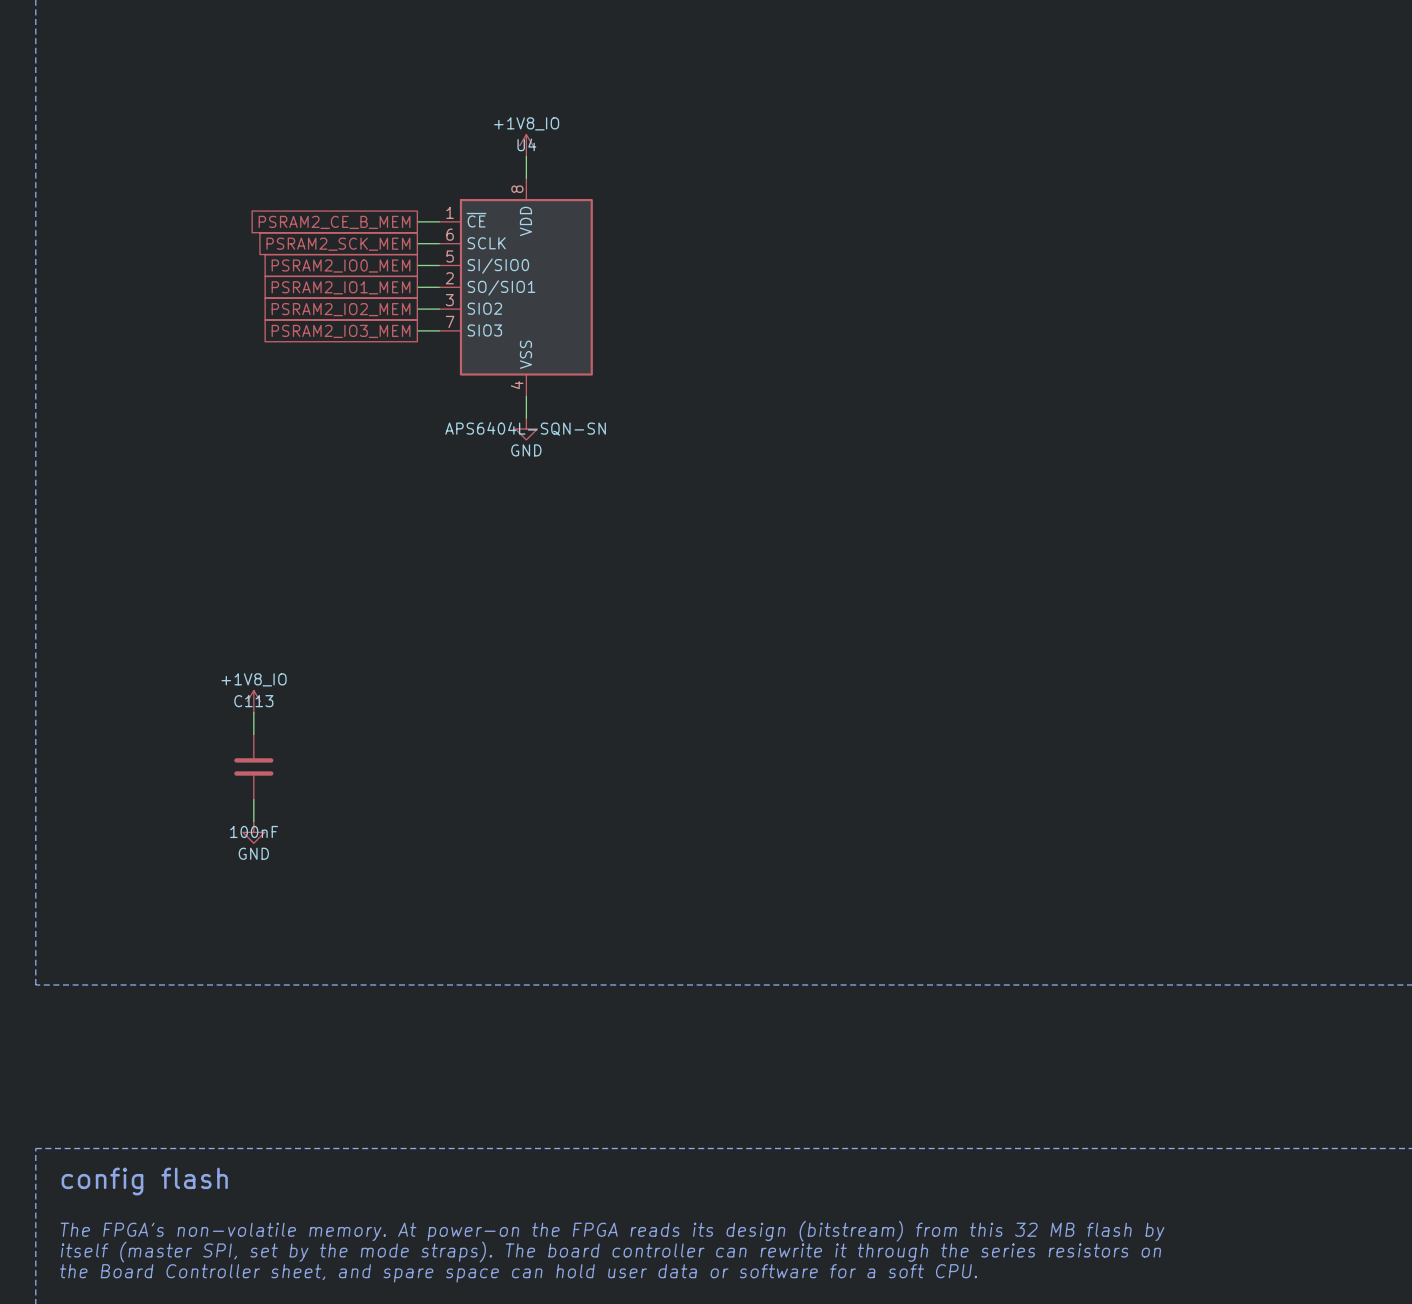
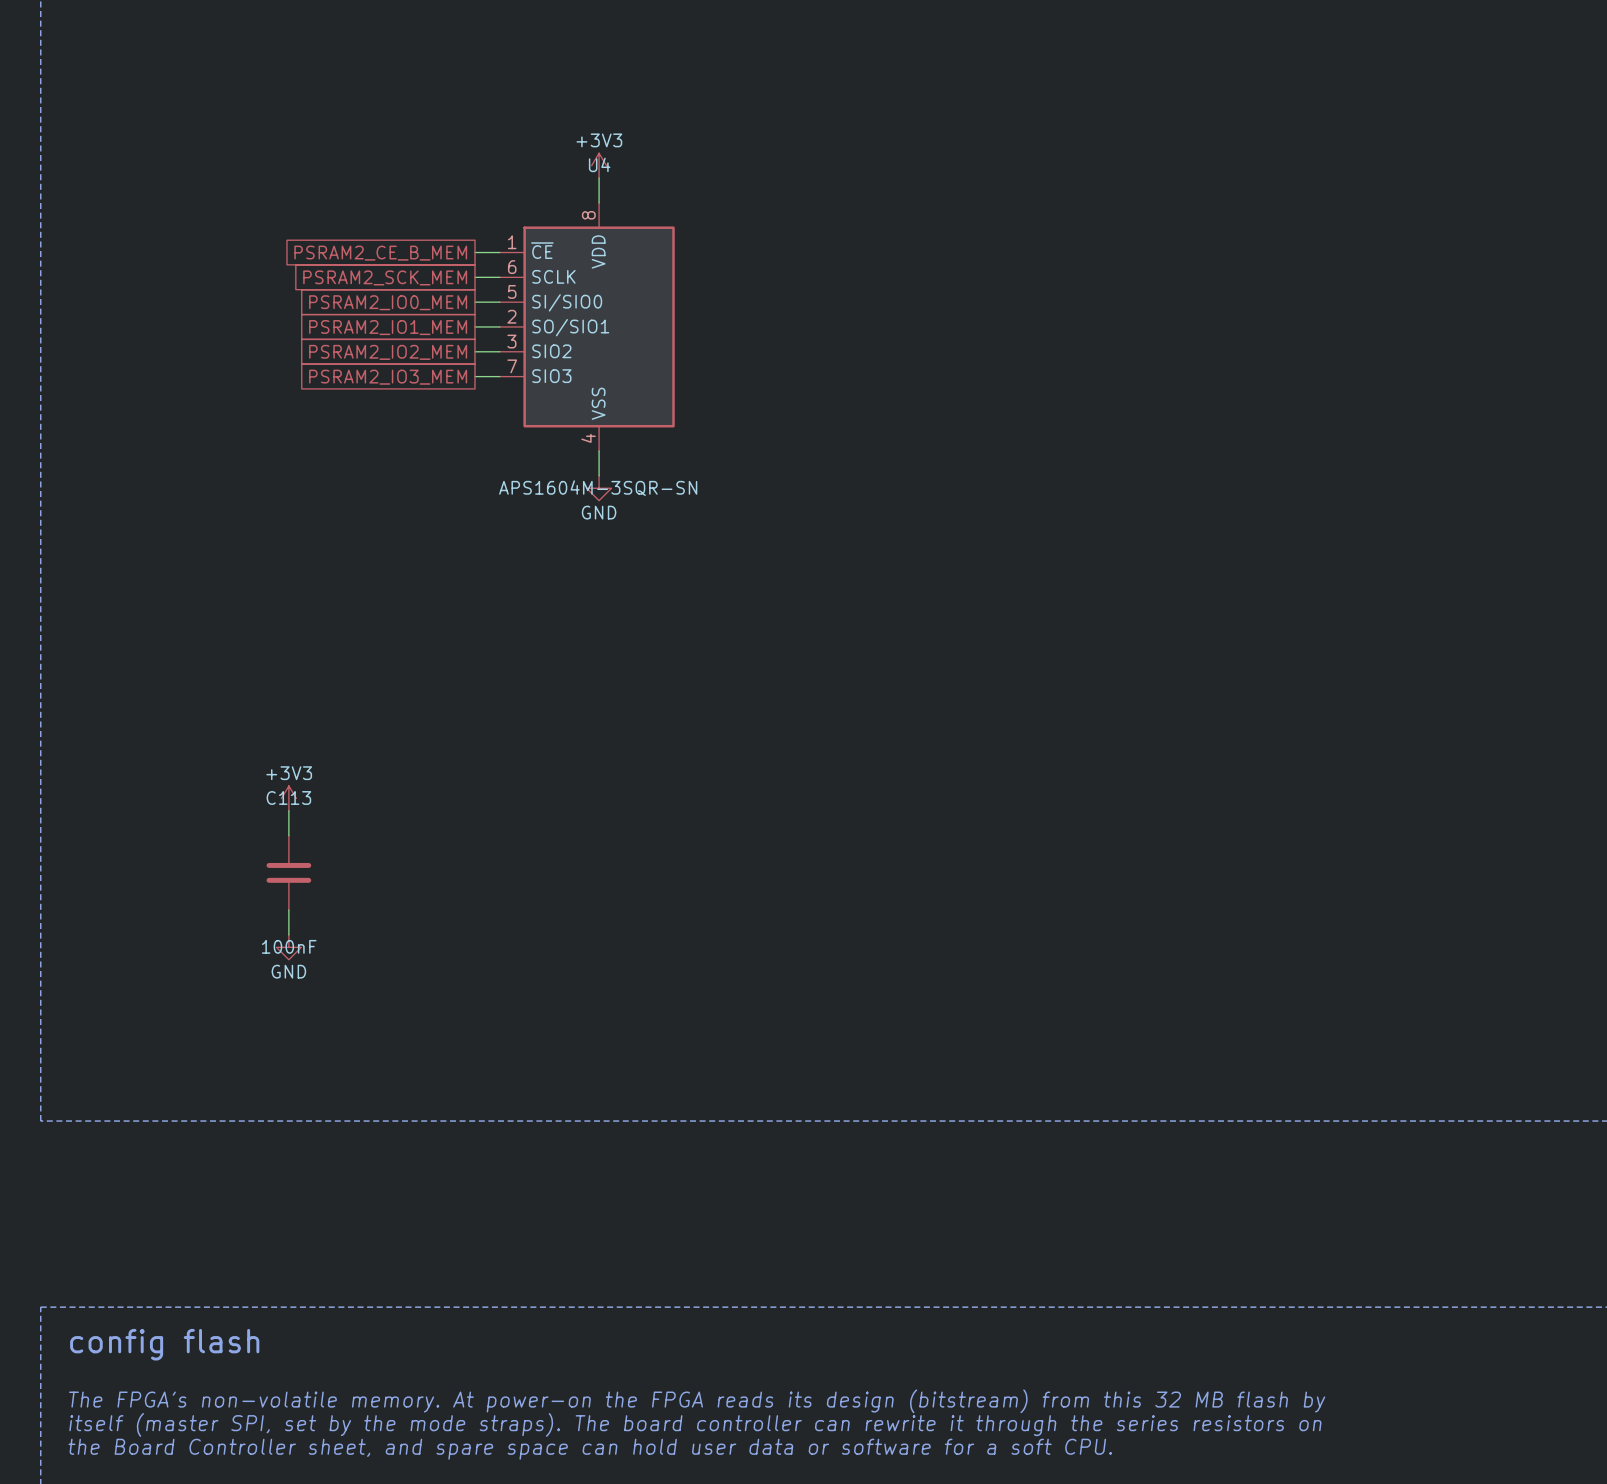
power symbol: +1V8_IO (526, 145) -> +3V3 (599, 165)
U4 value: APS6404L-SQN-SN (525, 428) -> APS1604M-3SQR-SN (598, 488)
power symbol: +1V8_IO (253, 701) -> +3V3 (288, 798)

